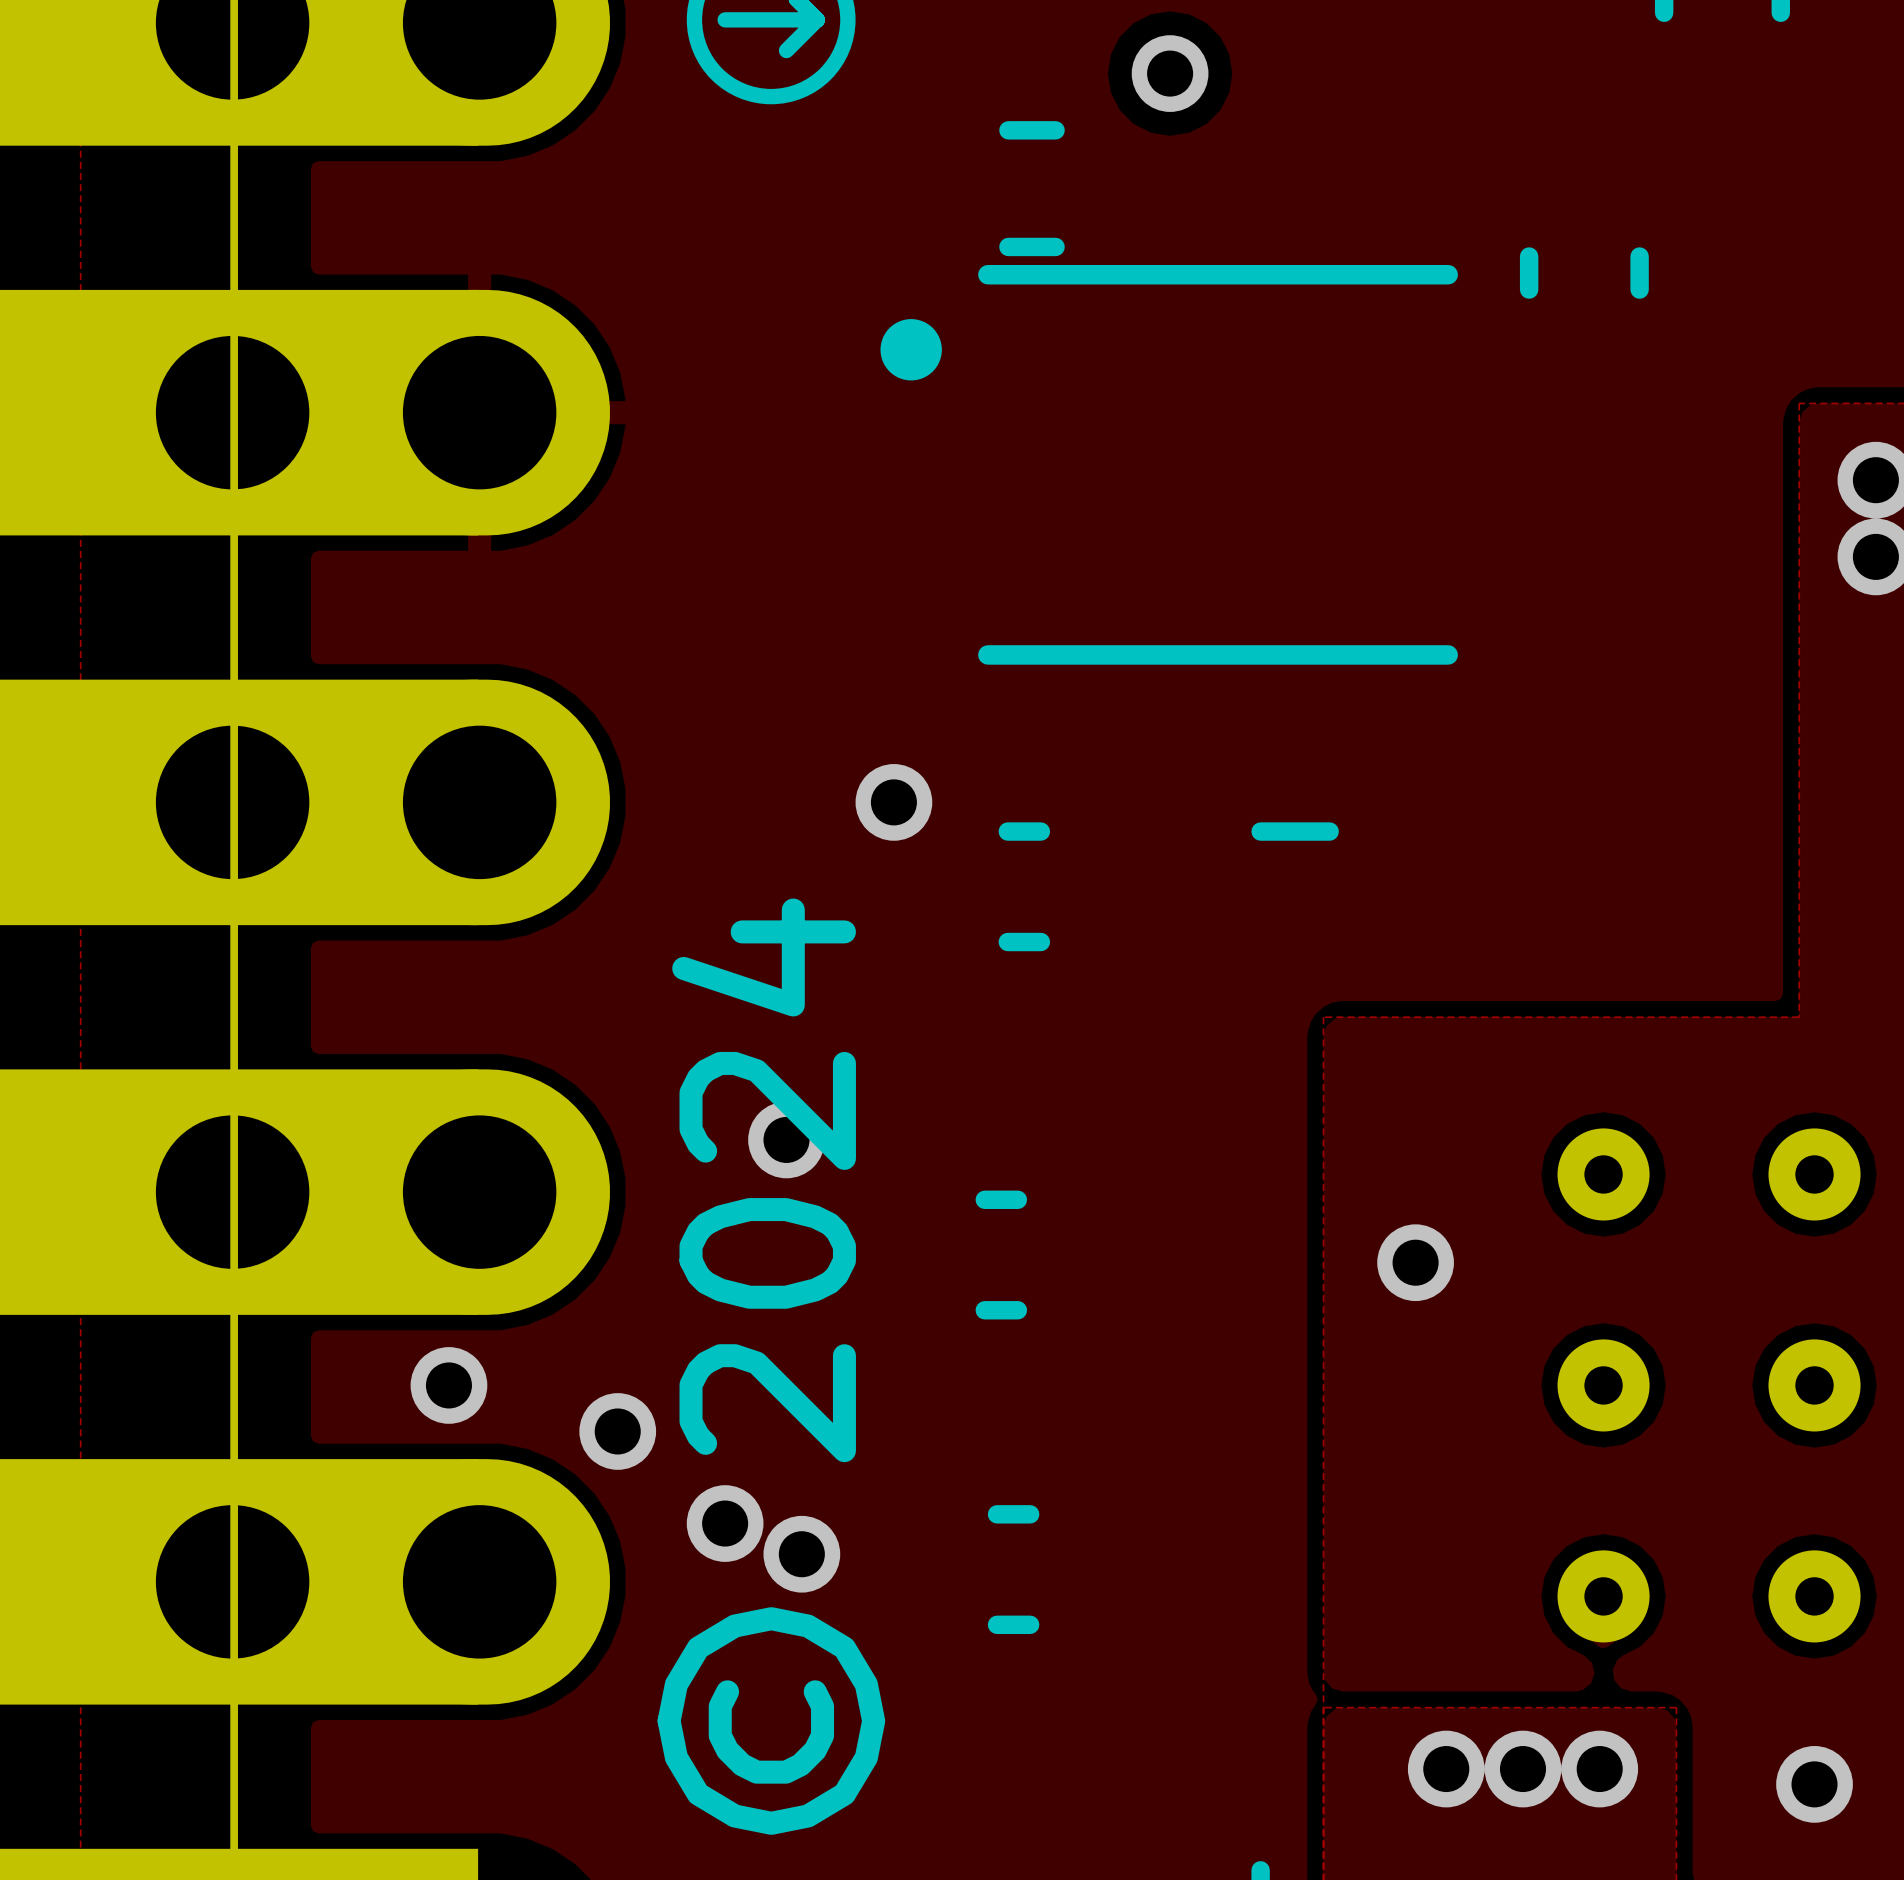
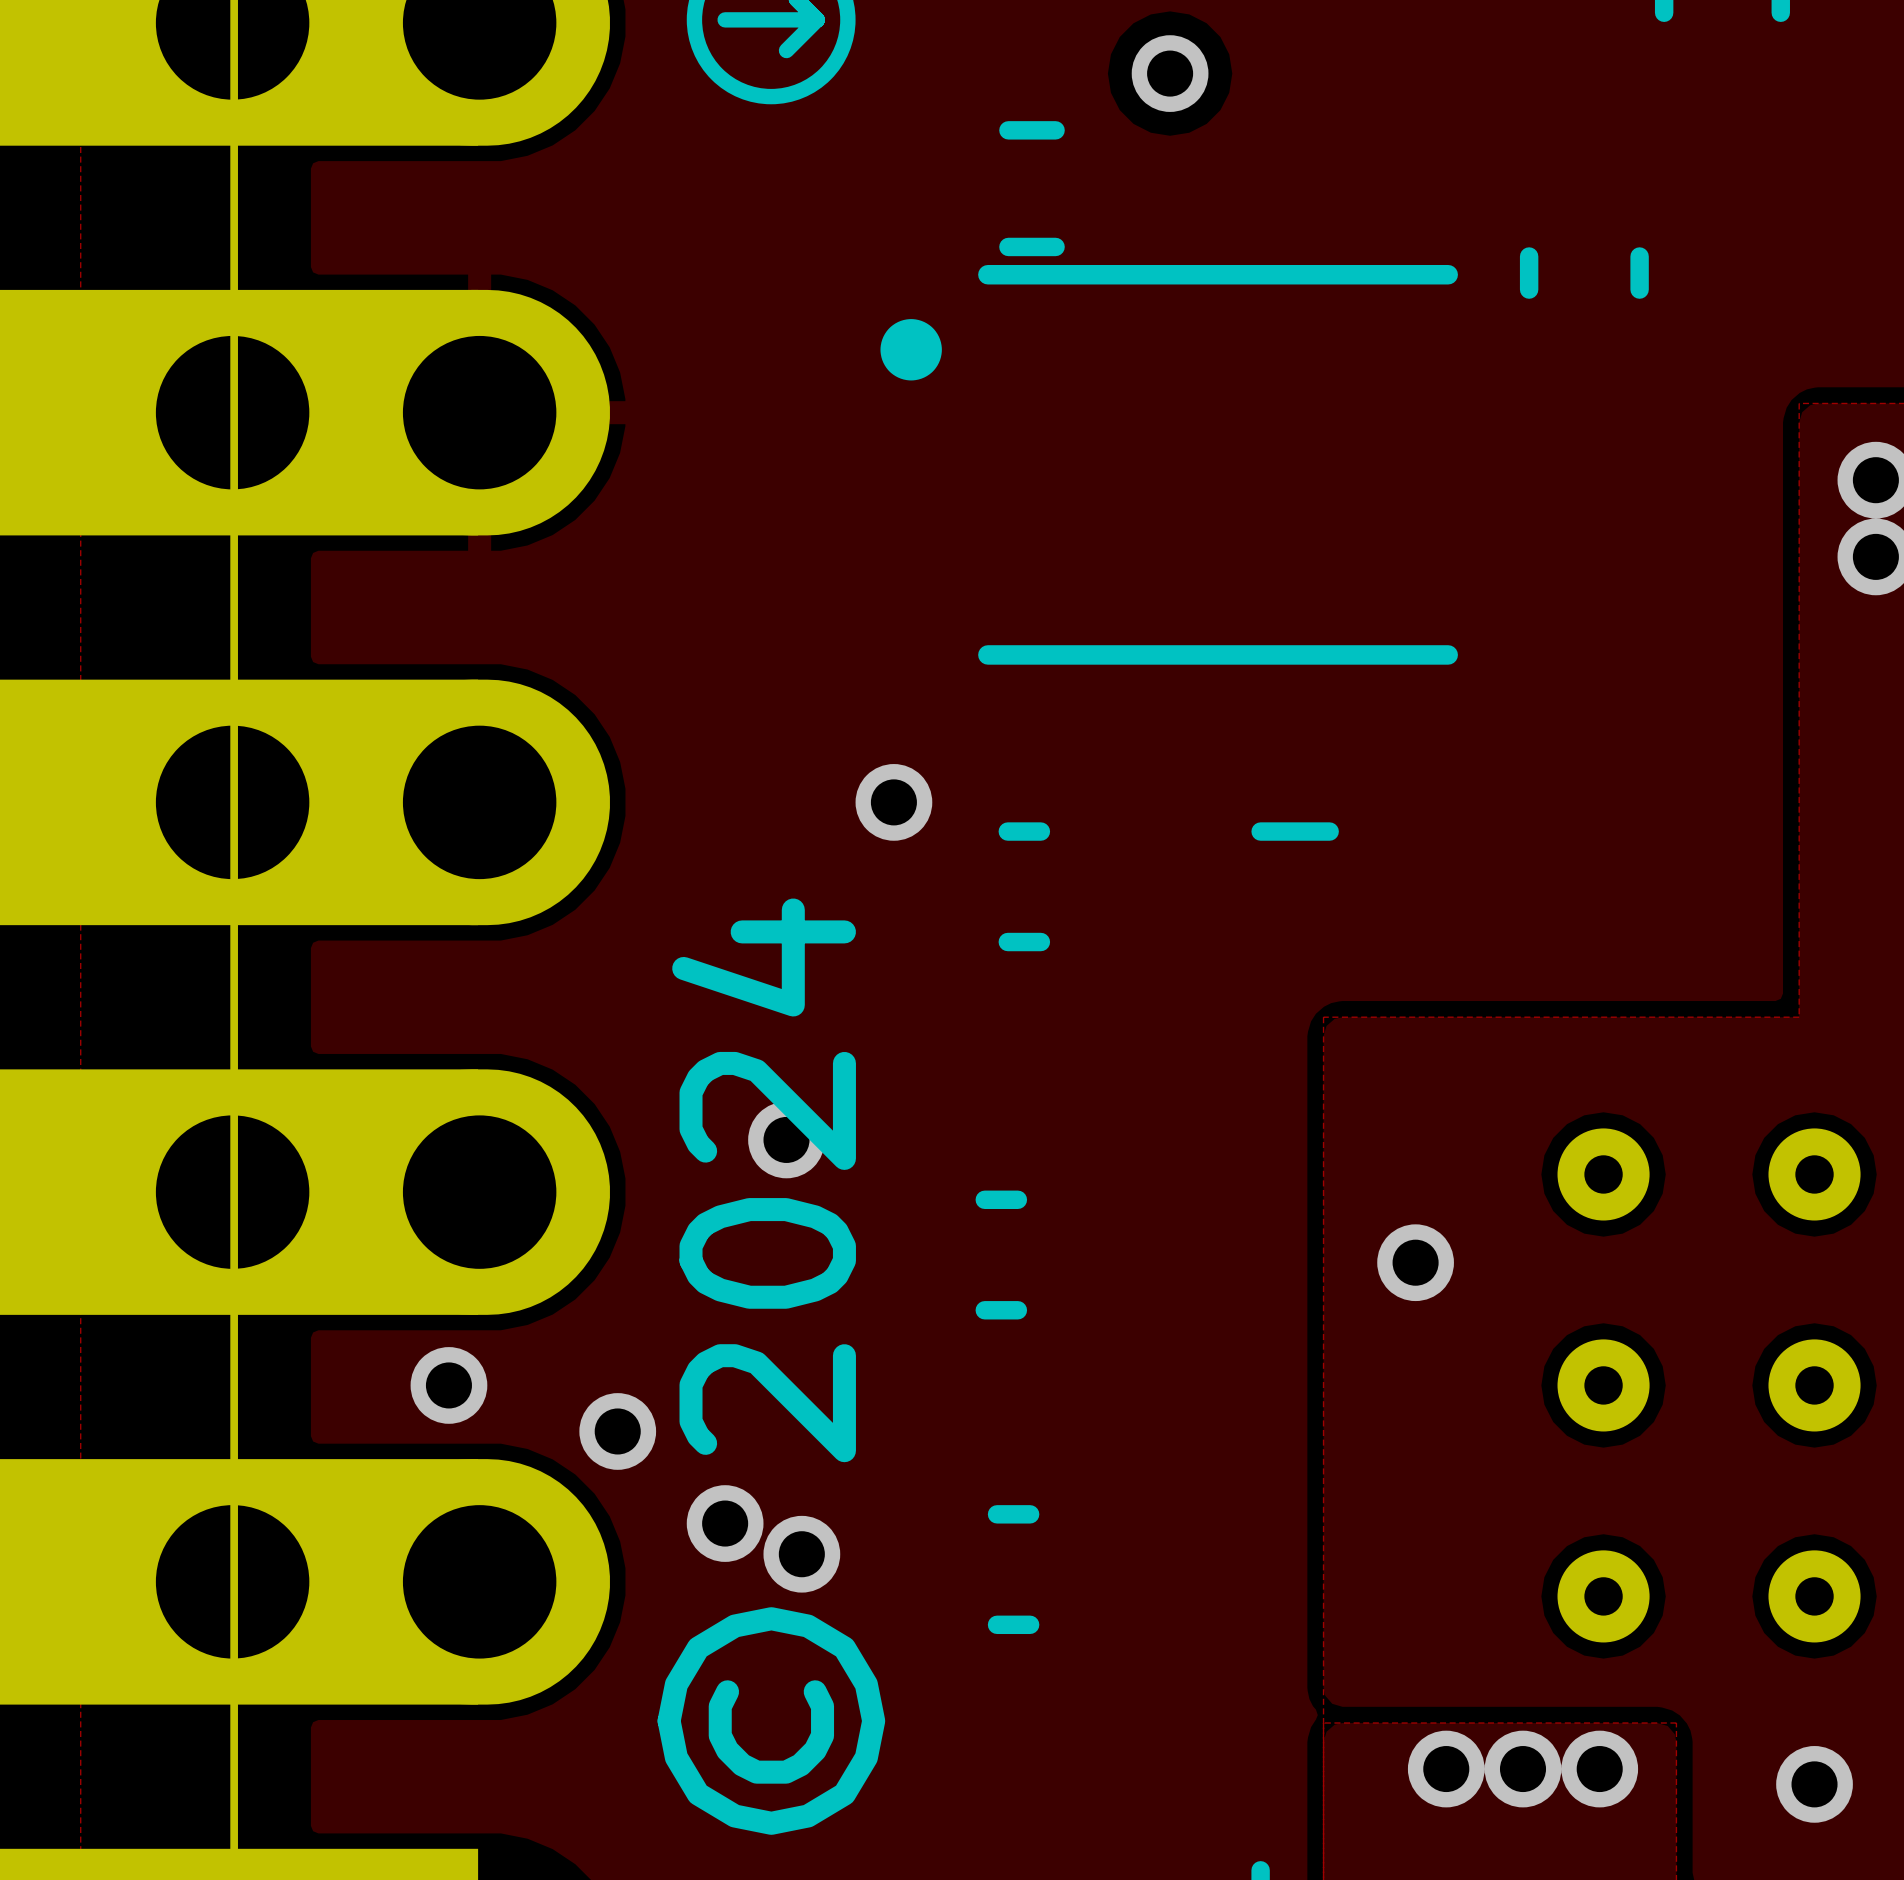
zone outline: (1323, 1707) (1676, 1707) (1676, 1723) -> (1323, 1723) (1676, 1723)

